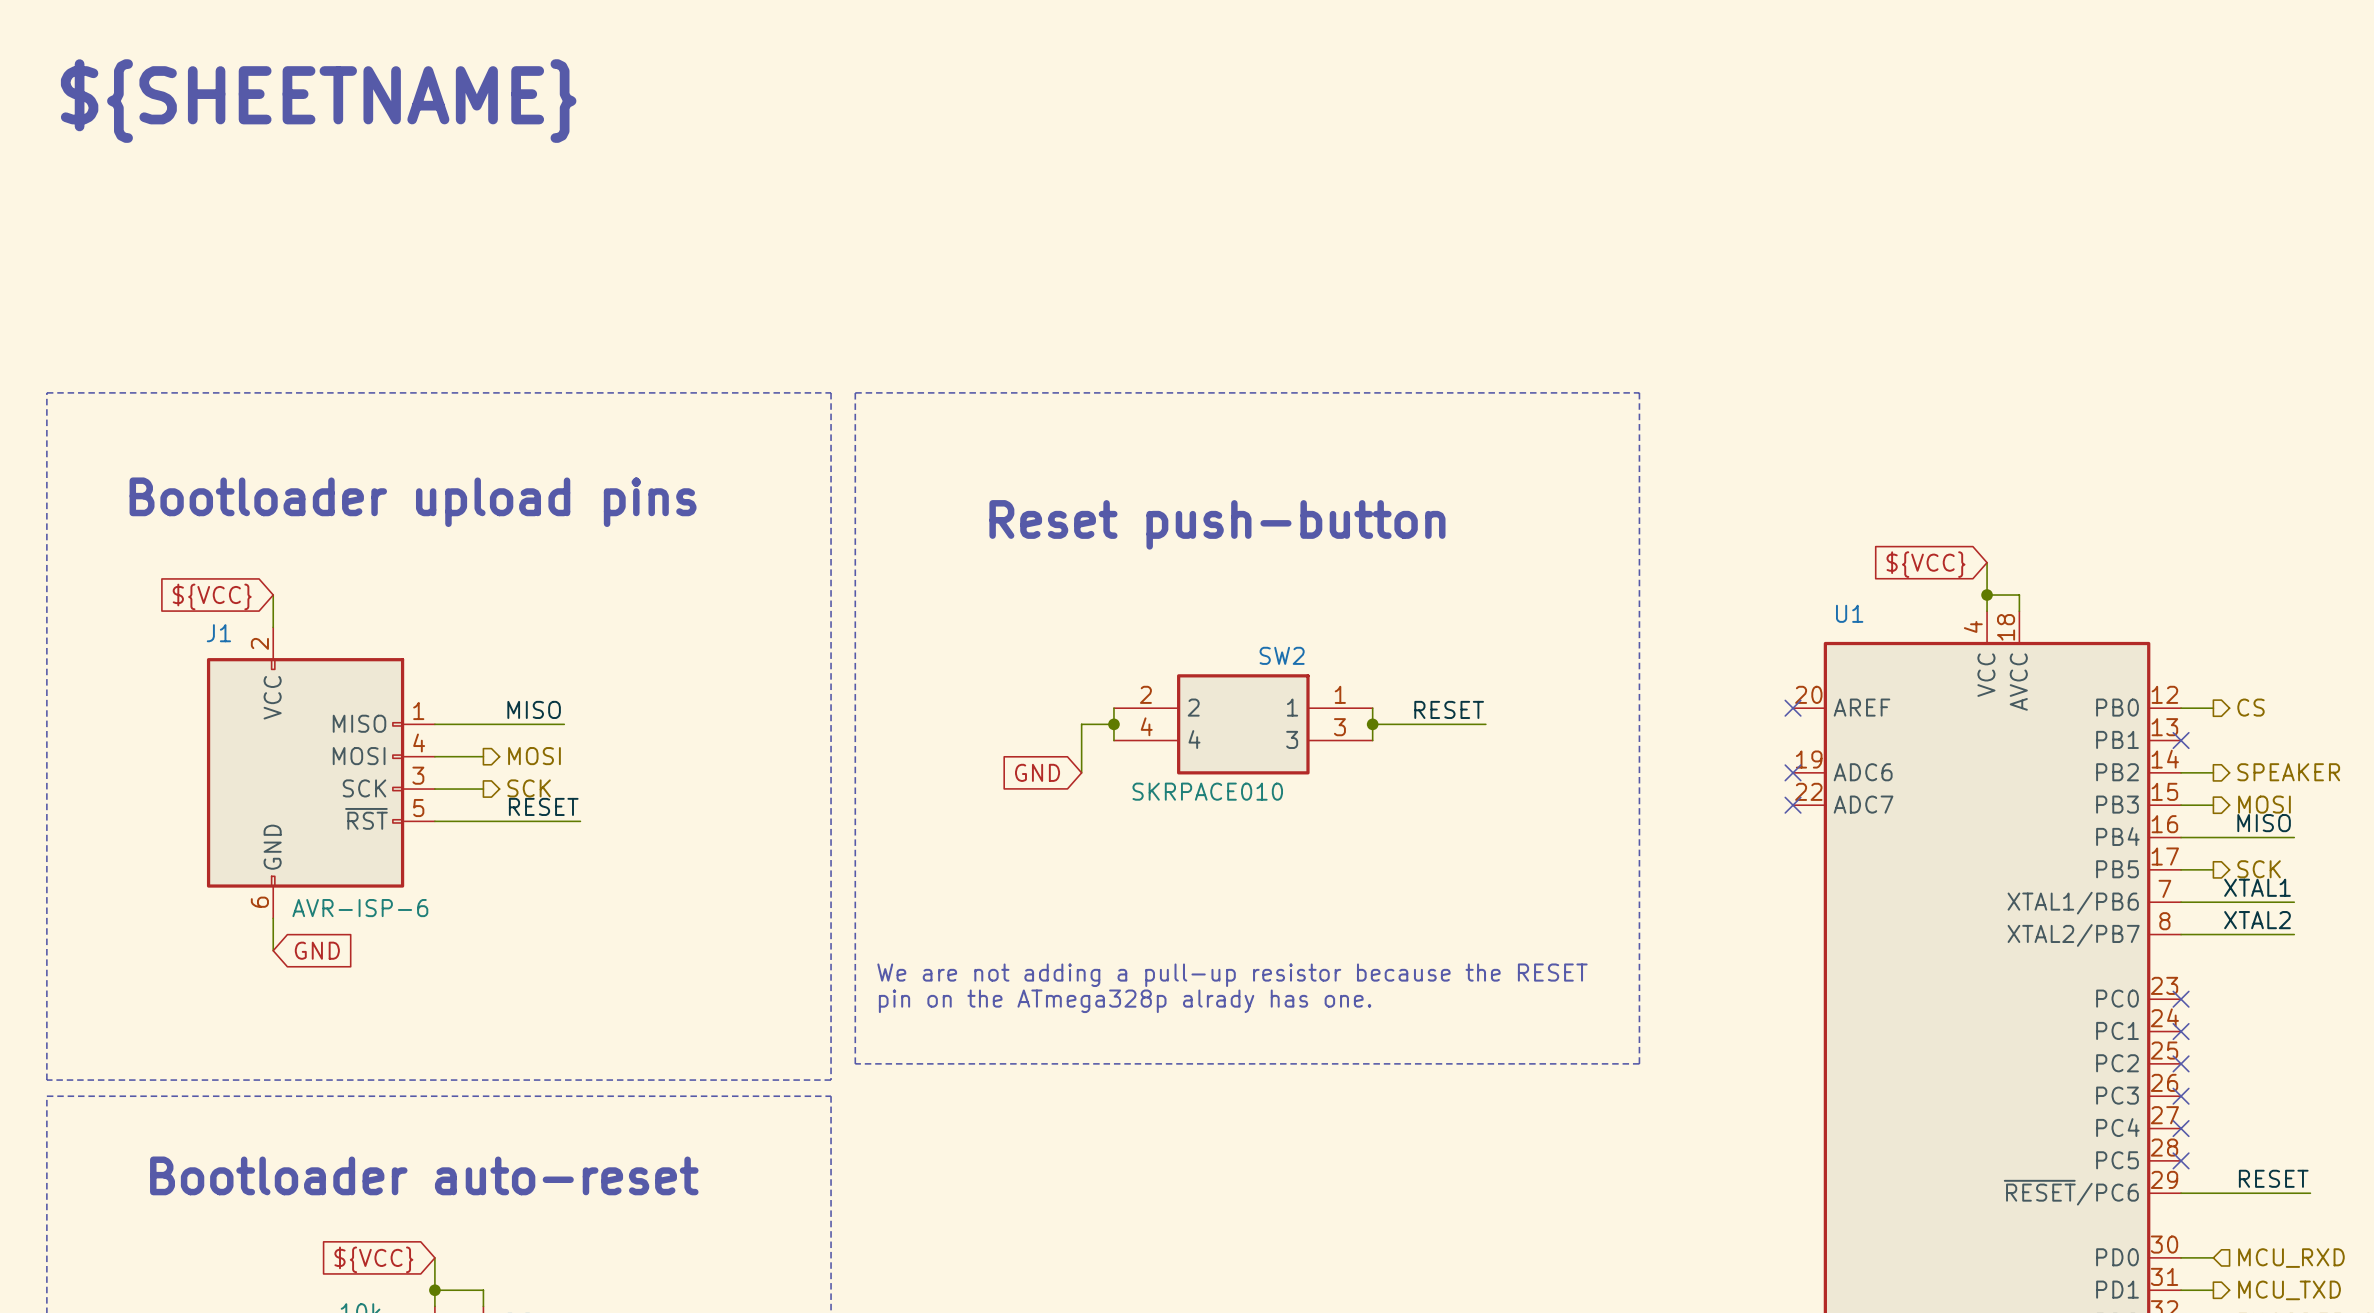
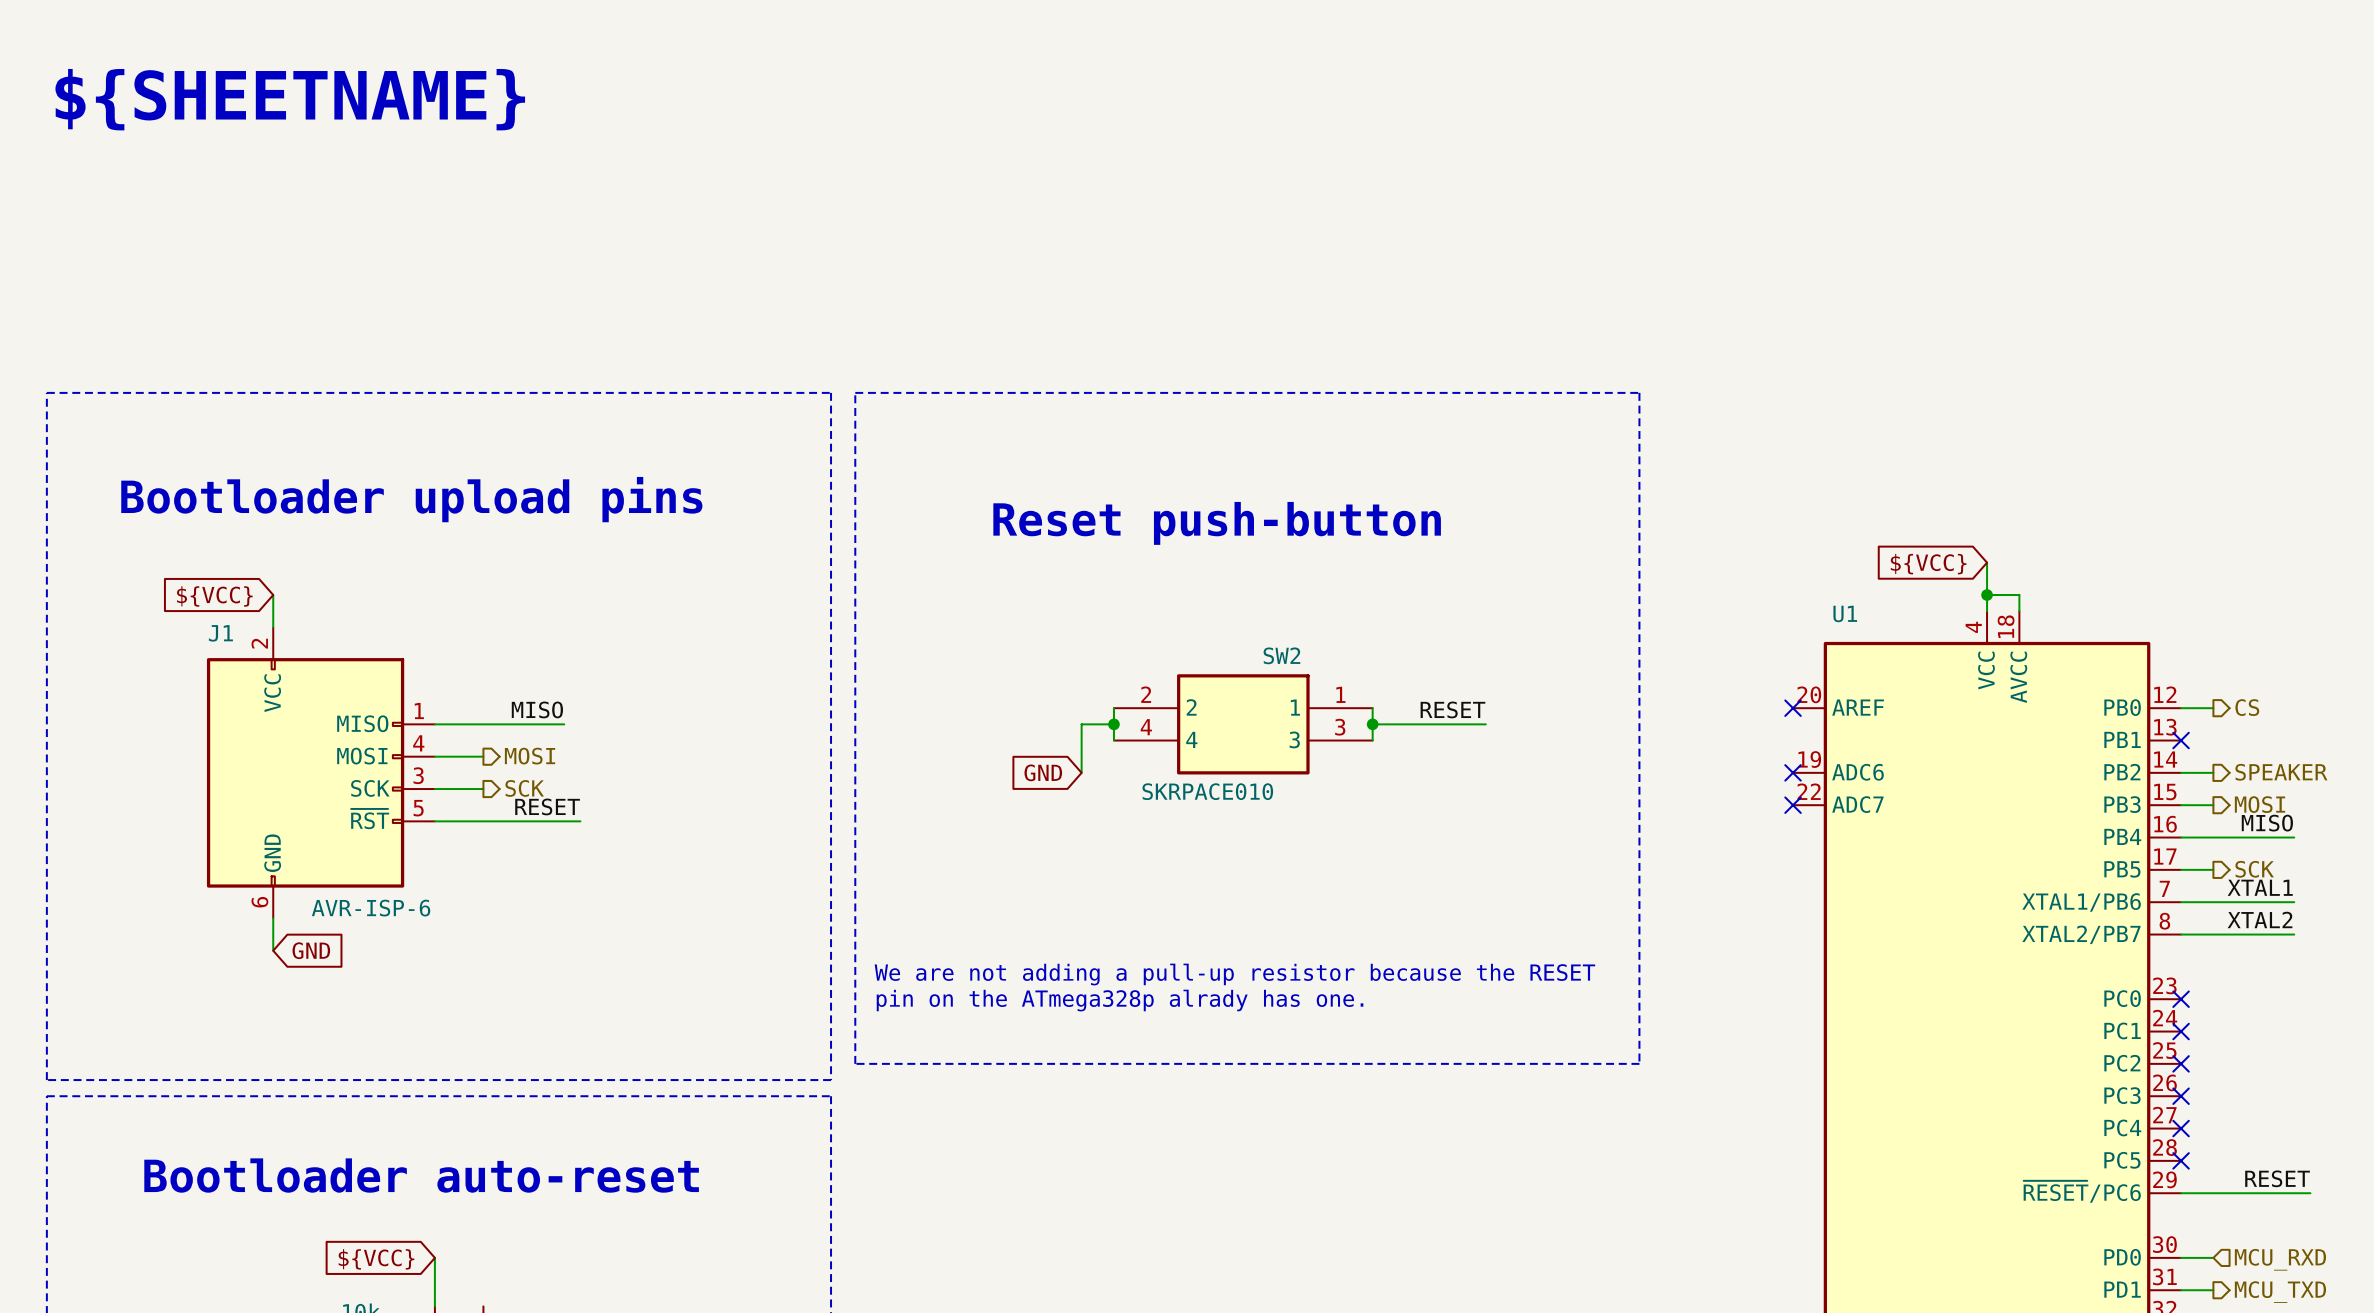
wire: (434, 1290) (483, 1290) (483, 1306) -> none
junction: (434, 1290) -> none

